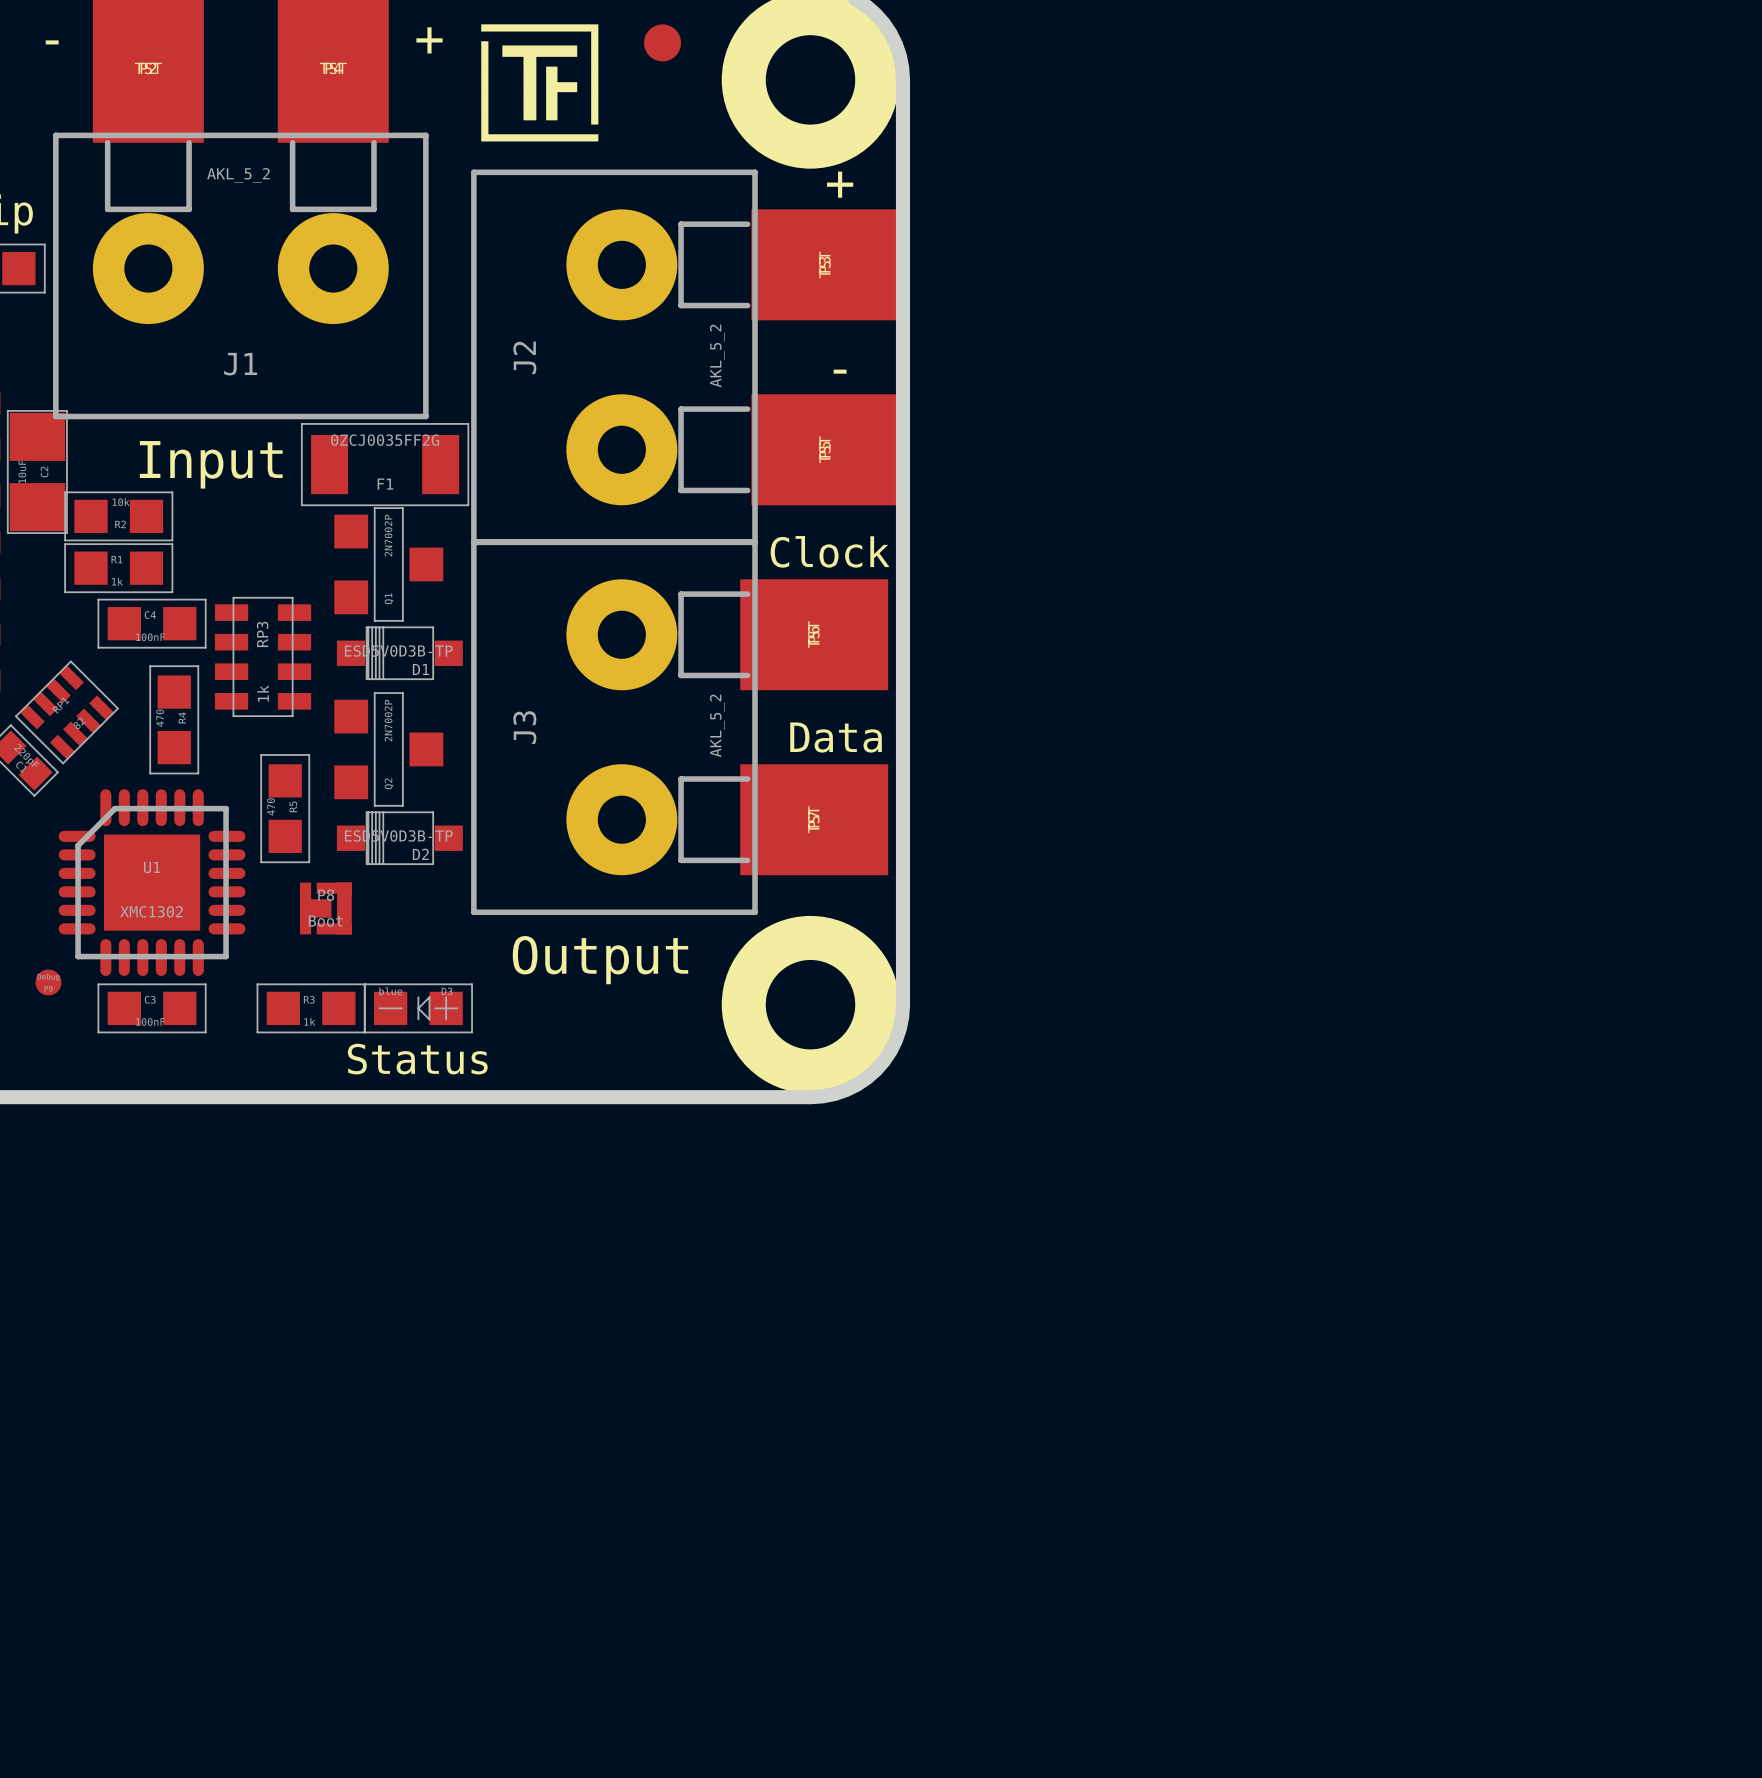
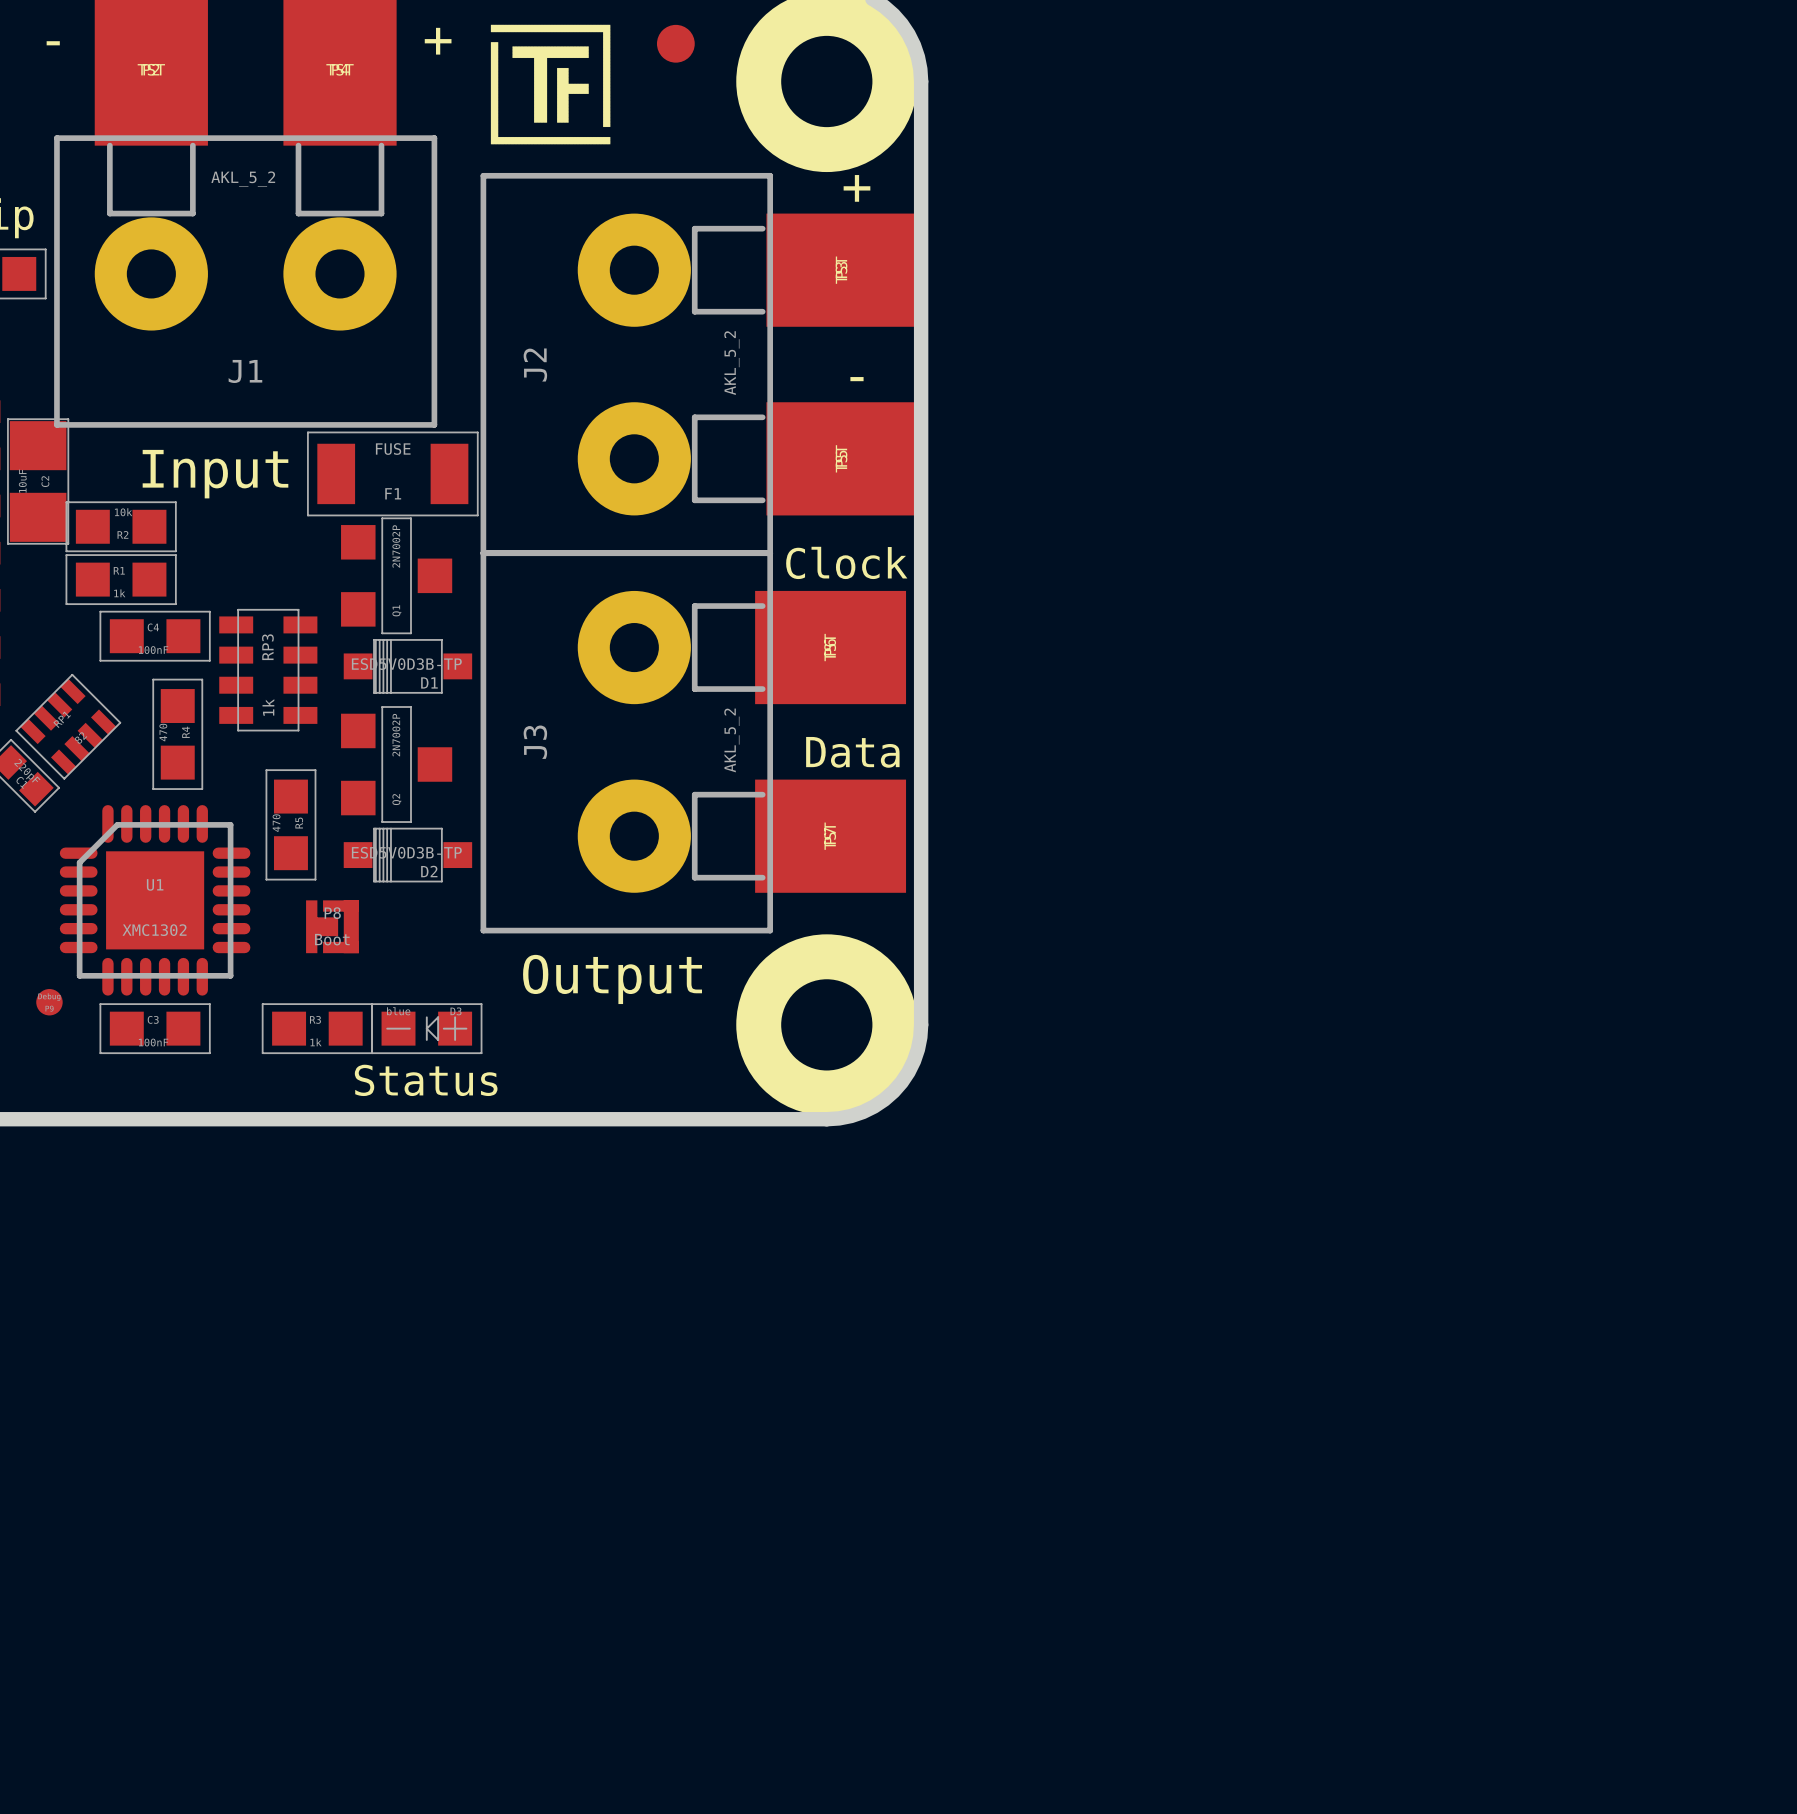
F1 value: 0ZCJ0035FF2G (385, 440) -> FUSE (393, 449)

